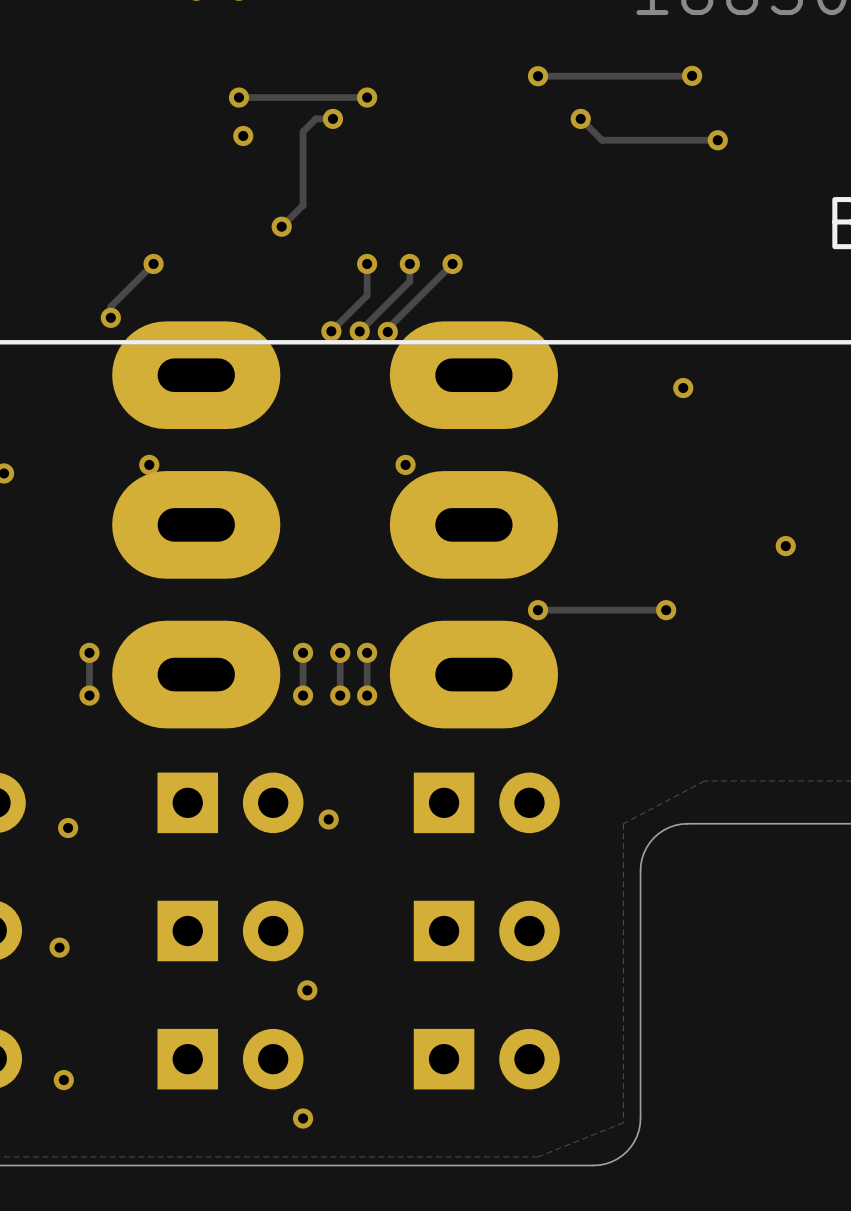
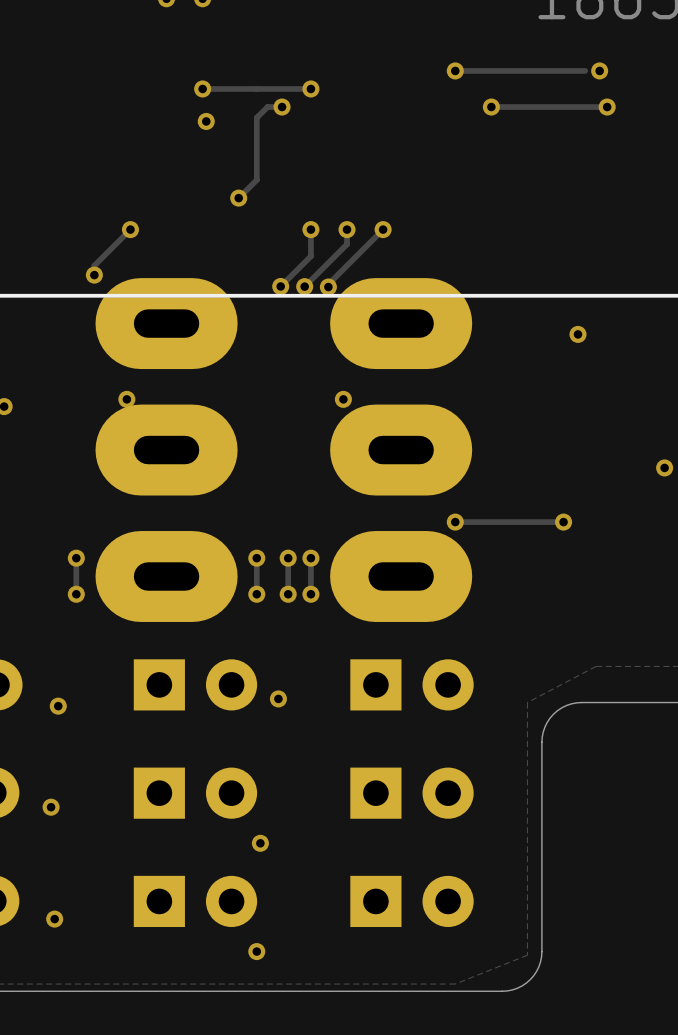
via position: (692, 75) -> (599, 70)
track: (580, 118) (602, 140) (717, 140) -> (491, 107) (607, 107)
via position: (717, 140) -> (607, 107)

